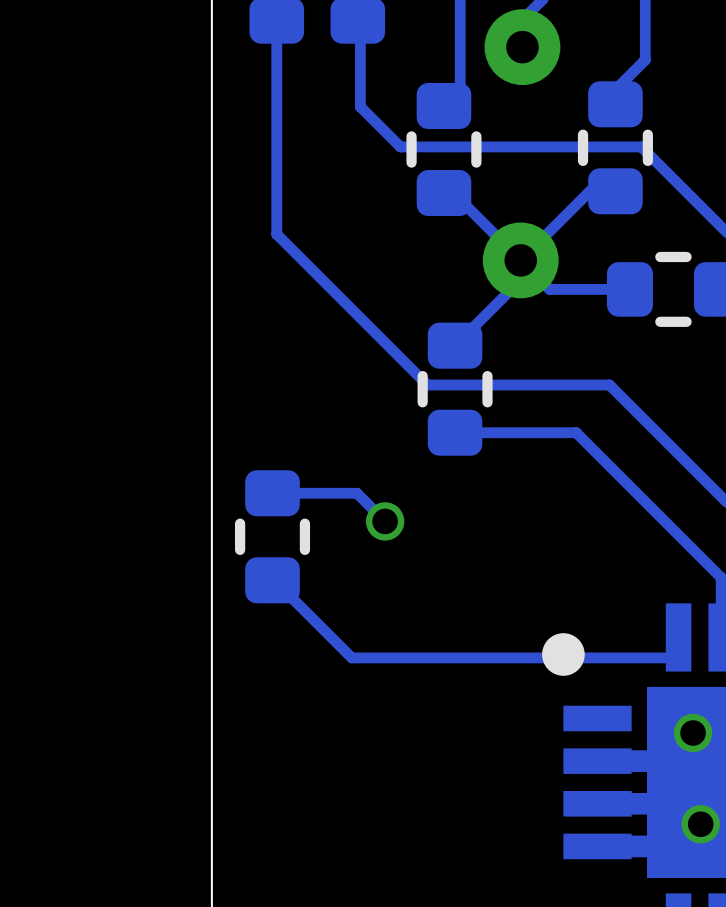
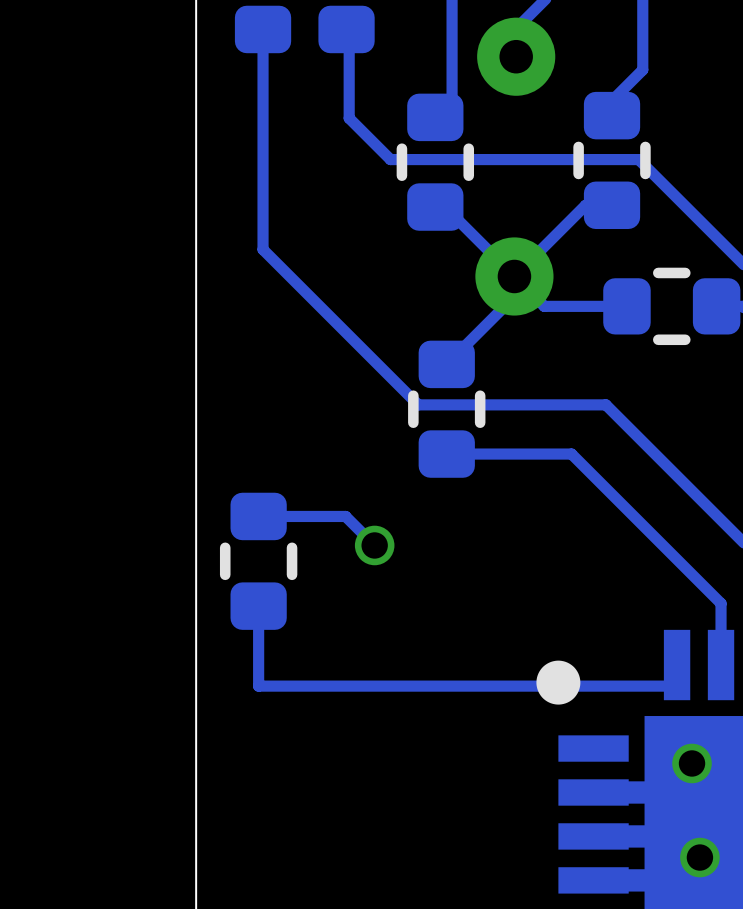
track: (274, 580) (351, 657) -> (258, 606) (258, 686) (340, 686)

